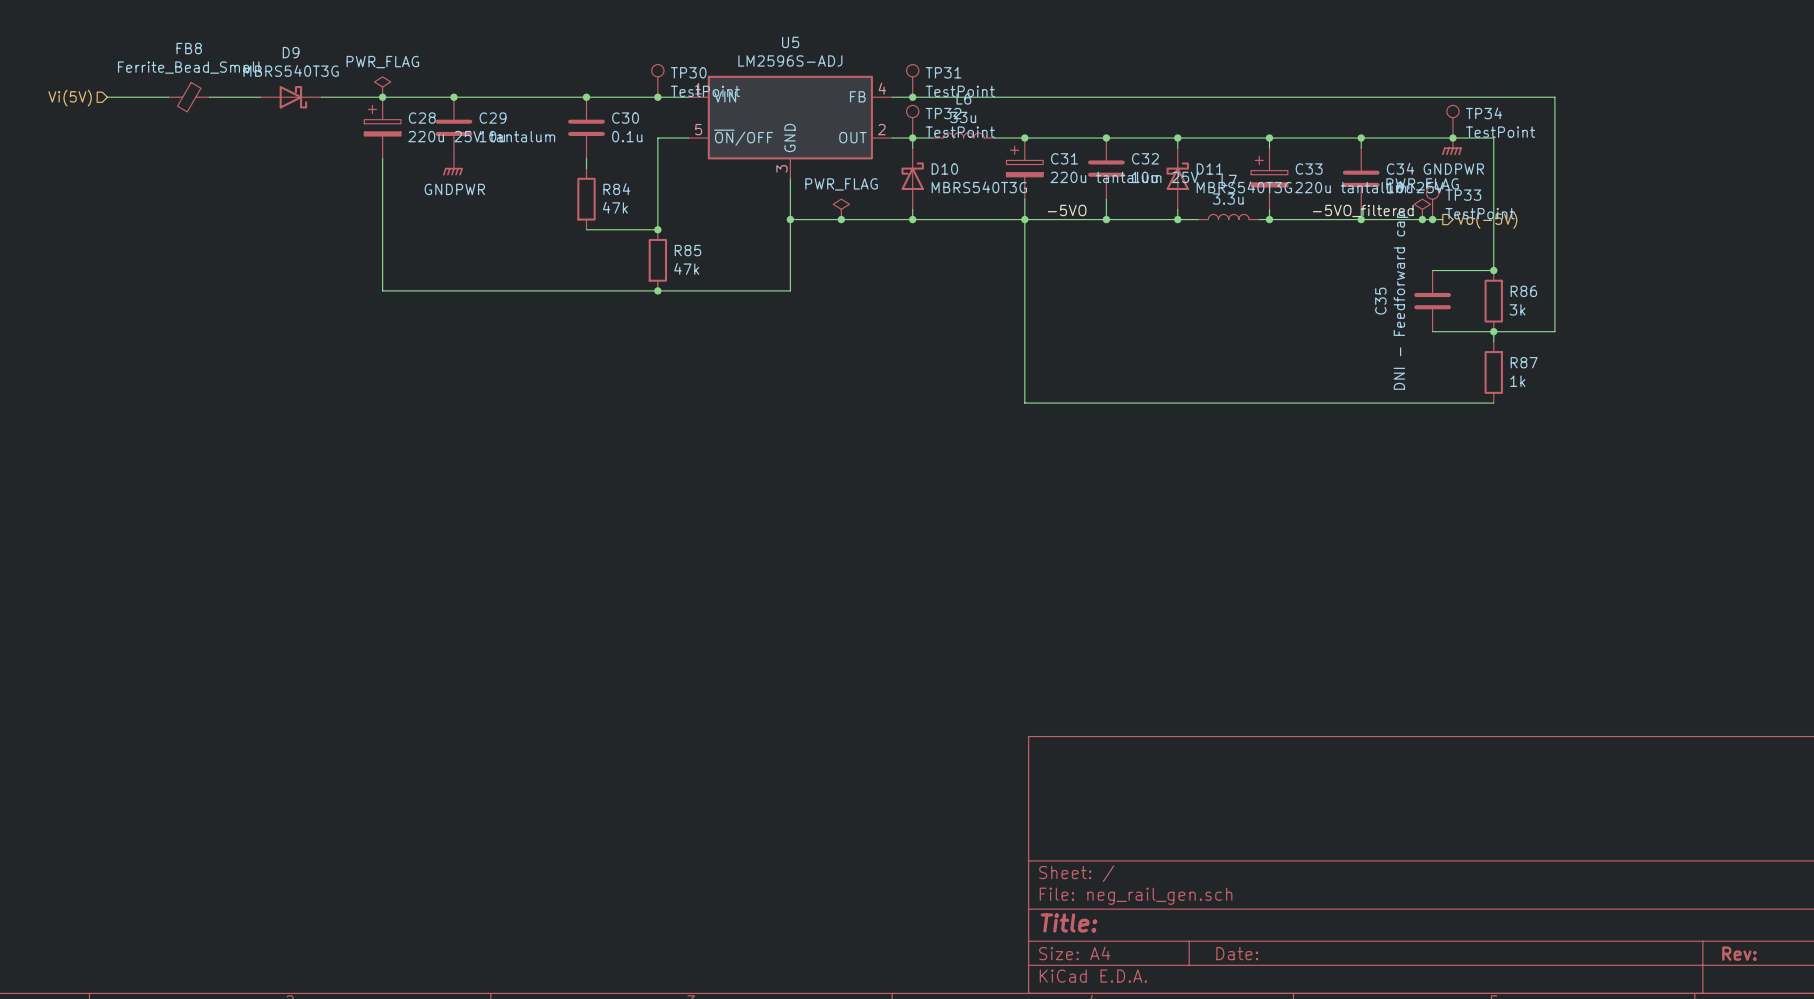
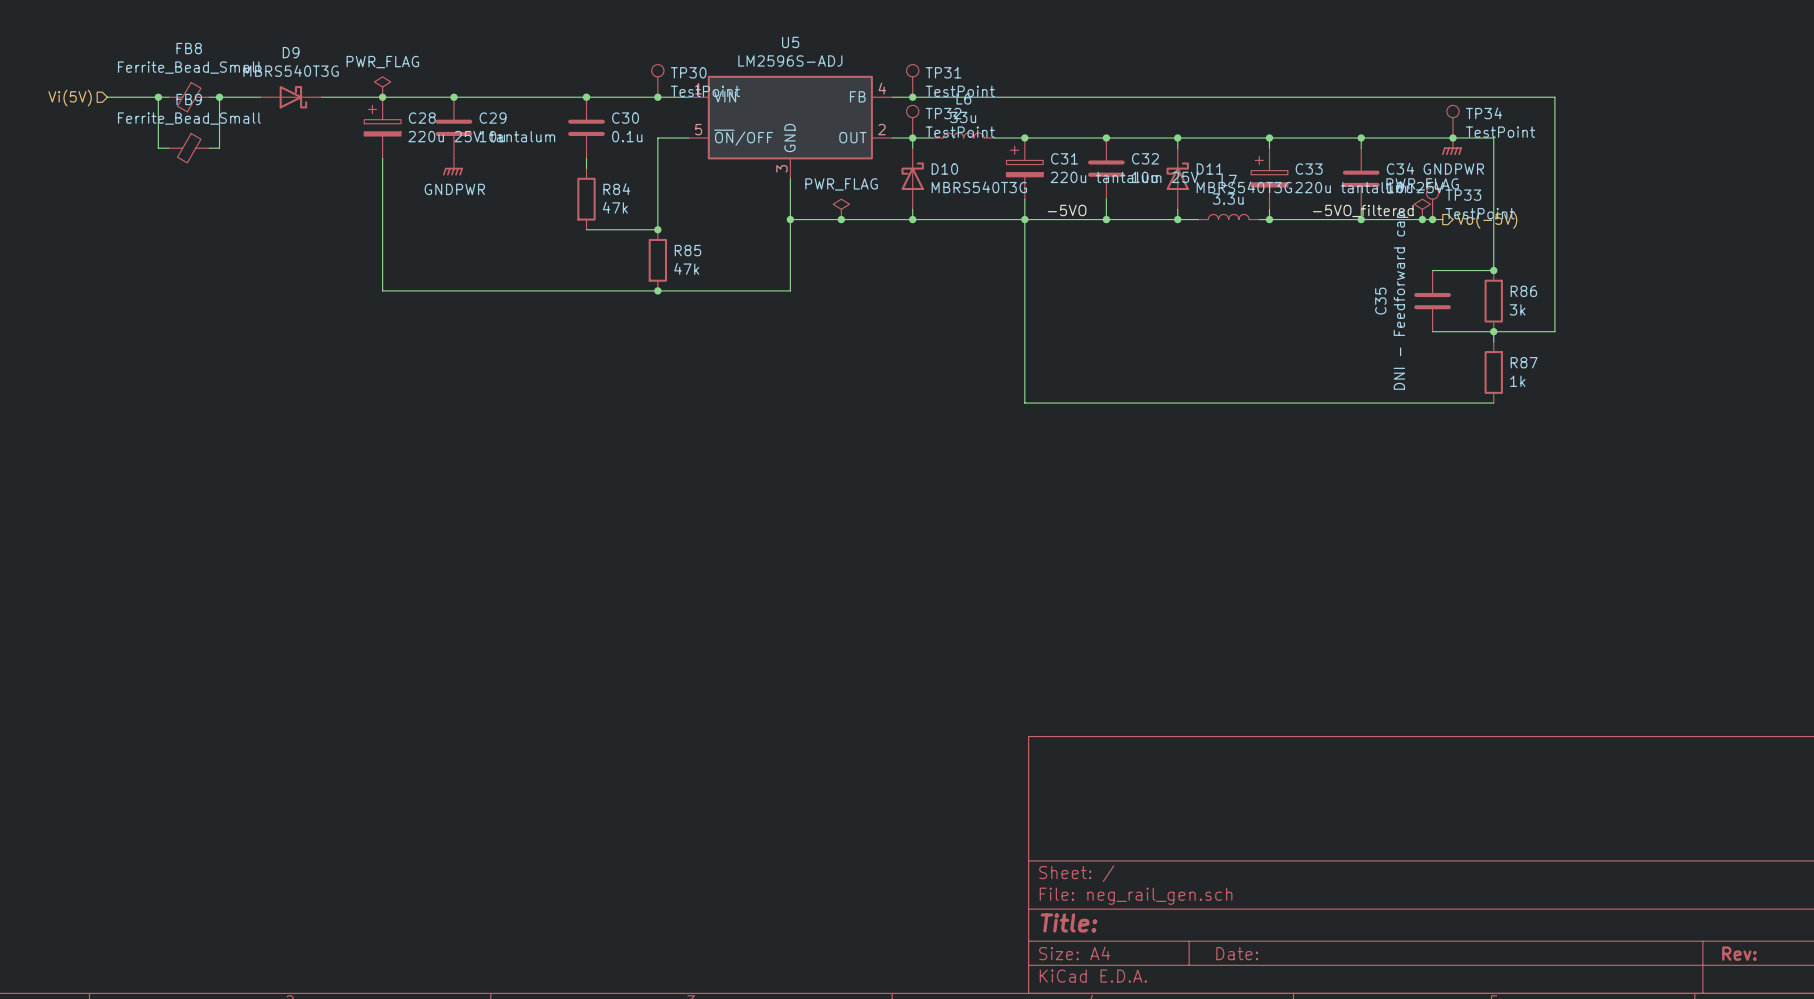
wire: none -> (158, 97) (158, 148) (168, 148)
junction: none -> (158, 97)
wire: none -> (219, 97) (219, 148) (209, 148)
junction: none -> (219, 97)
FB9: none -> Ferrite_Bead_Small (188, 148)

